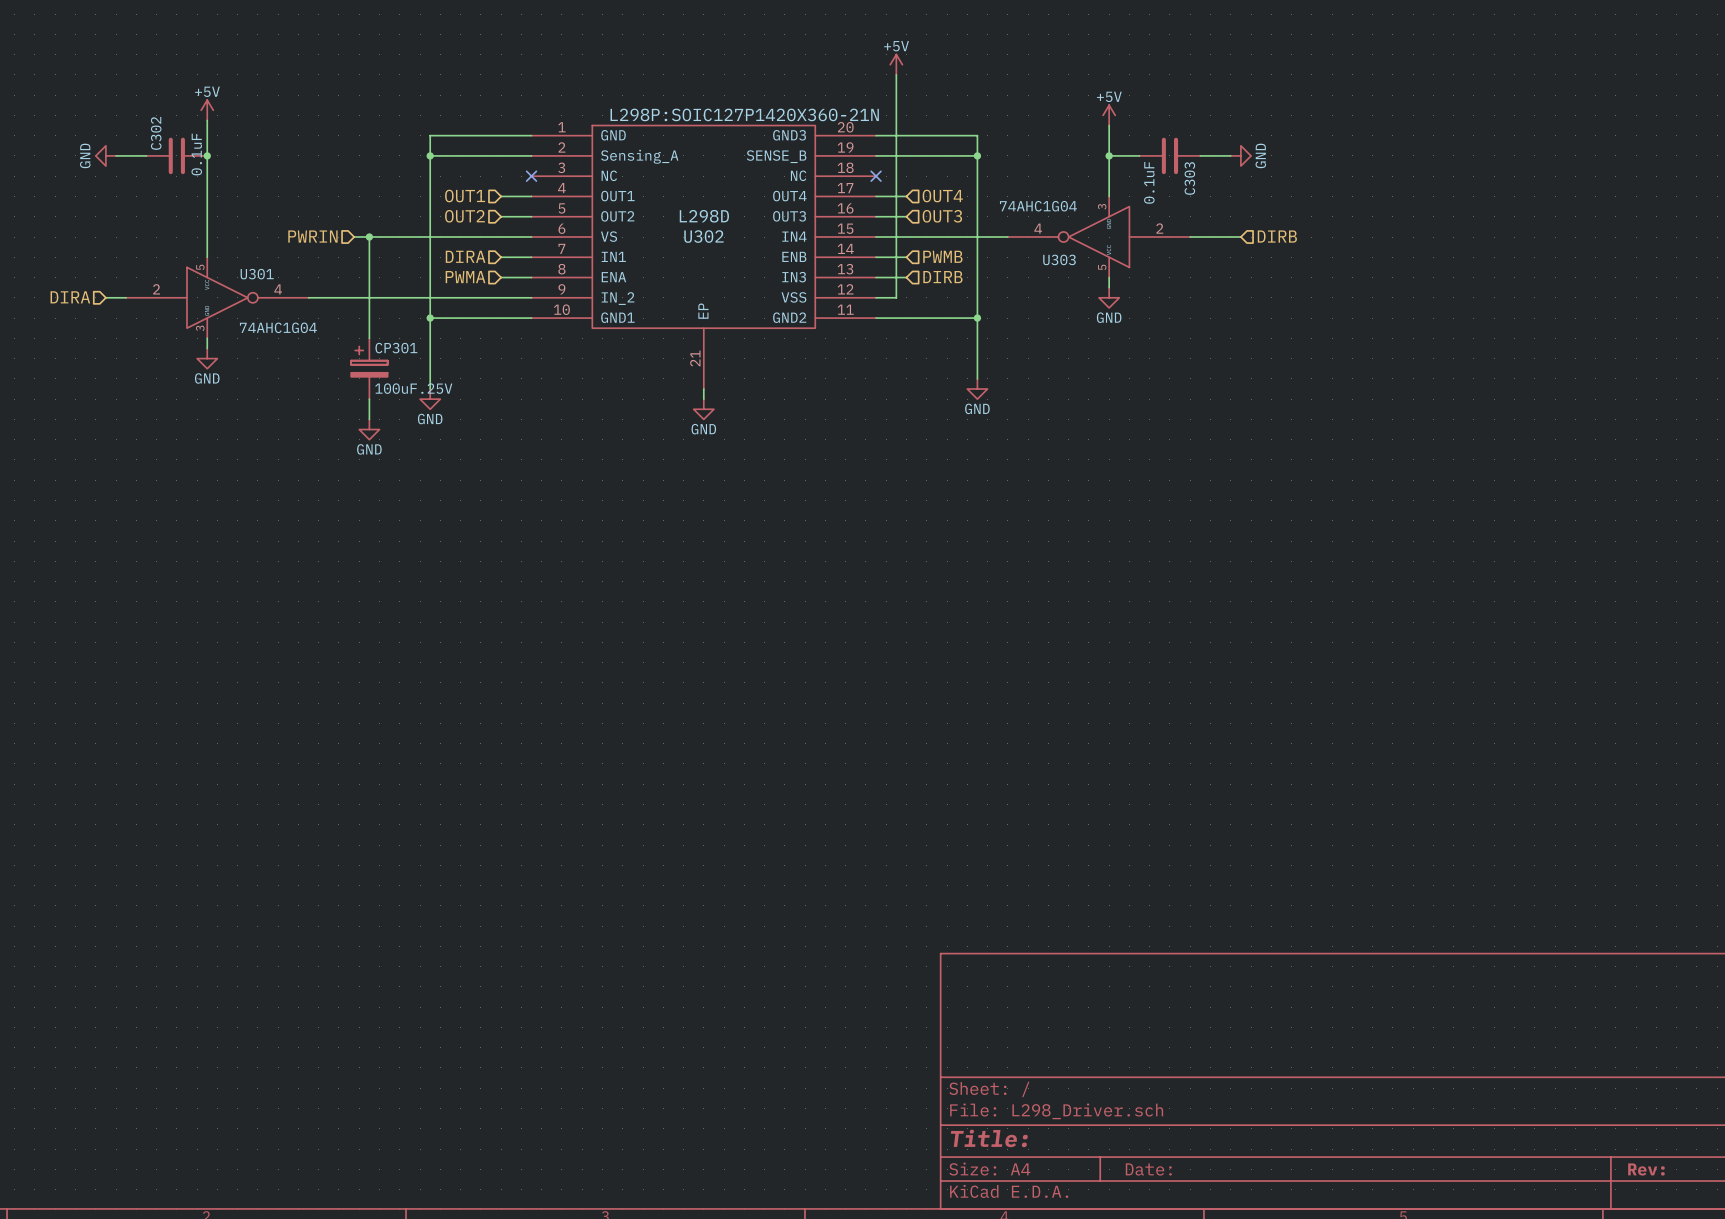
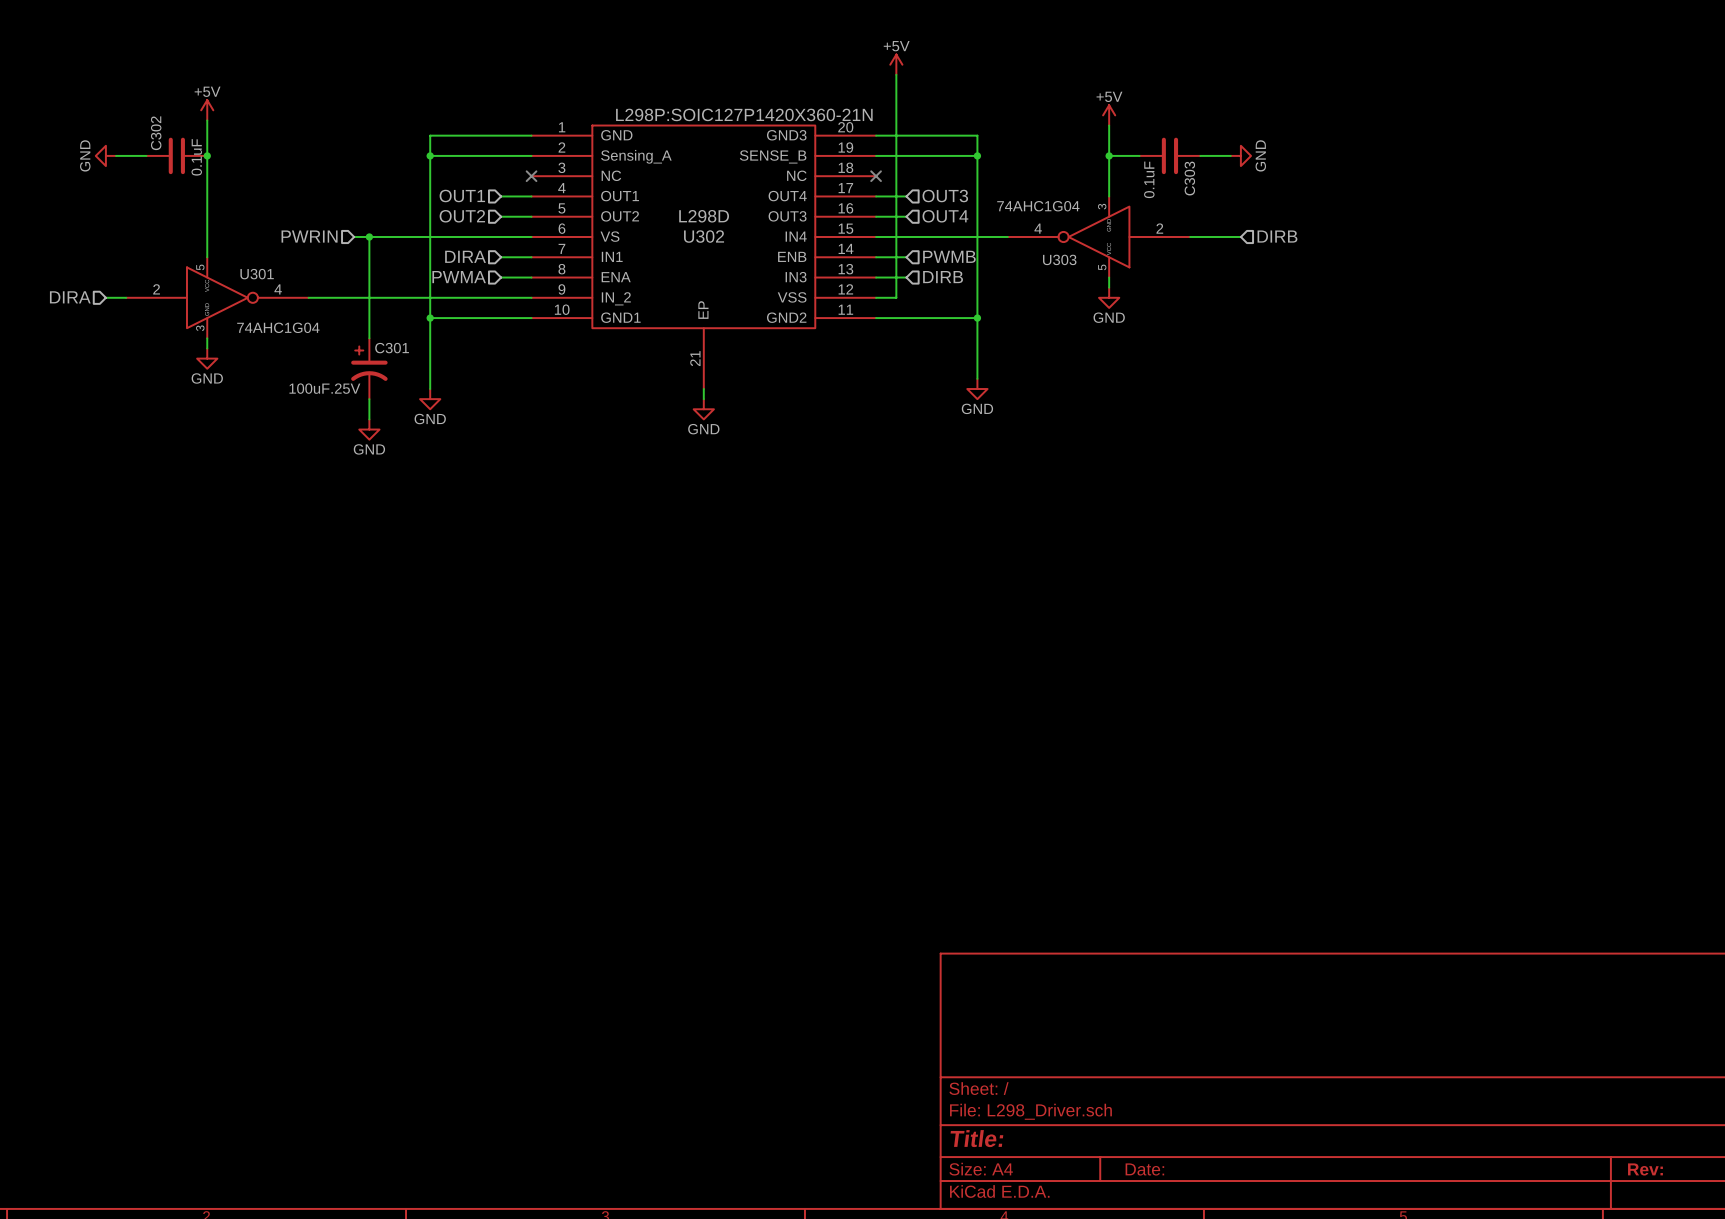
hierarchical label: OUT4 (942, 196) -> OUT3 (945, 196)
hierarchical label: OUT3 (942, 216) -> OUT4 (945, 216)
CP301: 100uF.25V (369, 368) -> none
C301: none -> 100uF.25V (369, 368)

